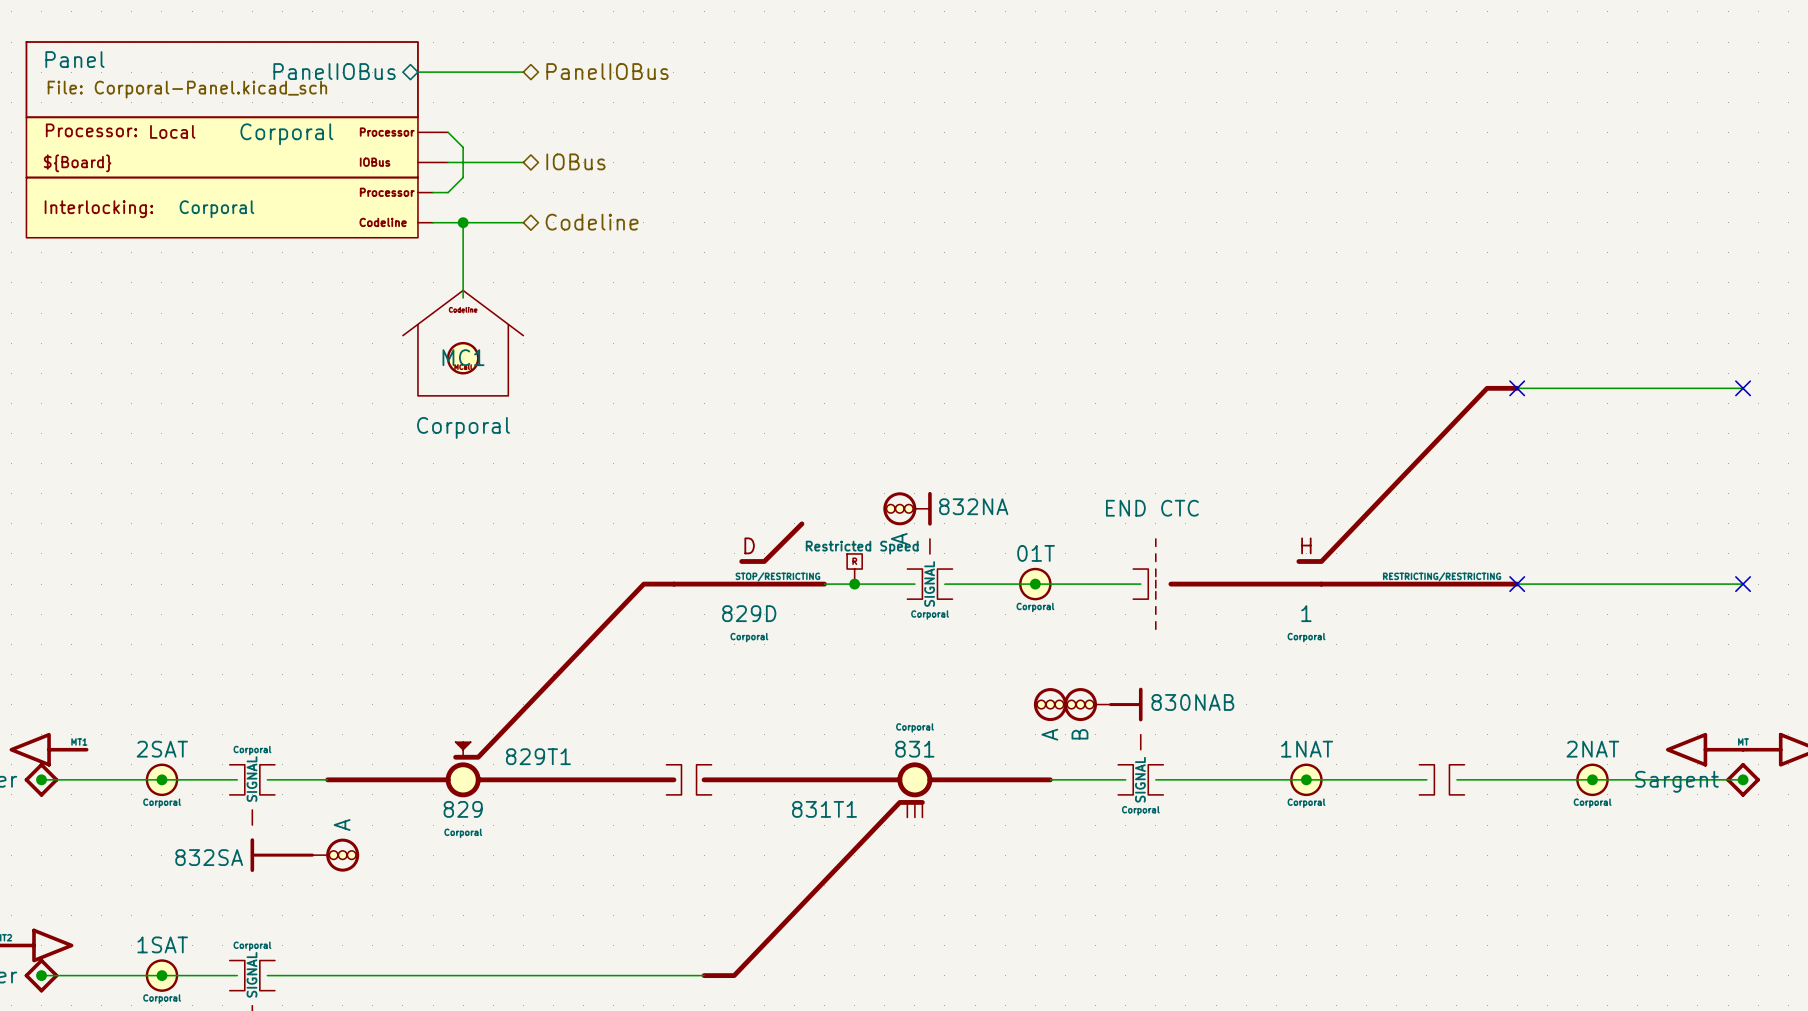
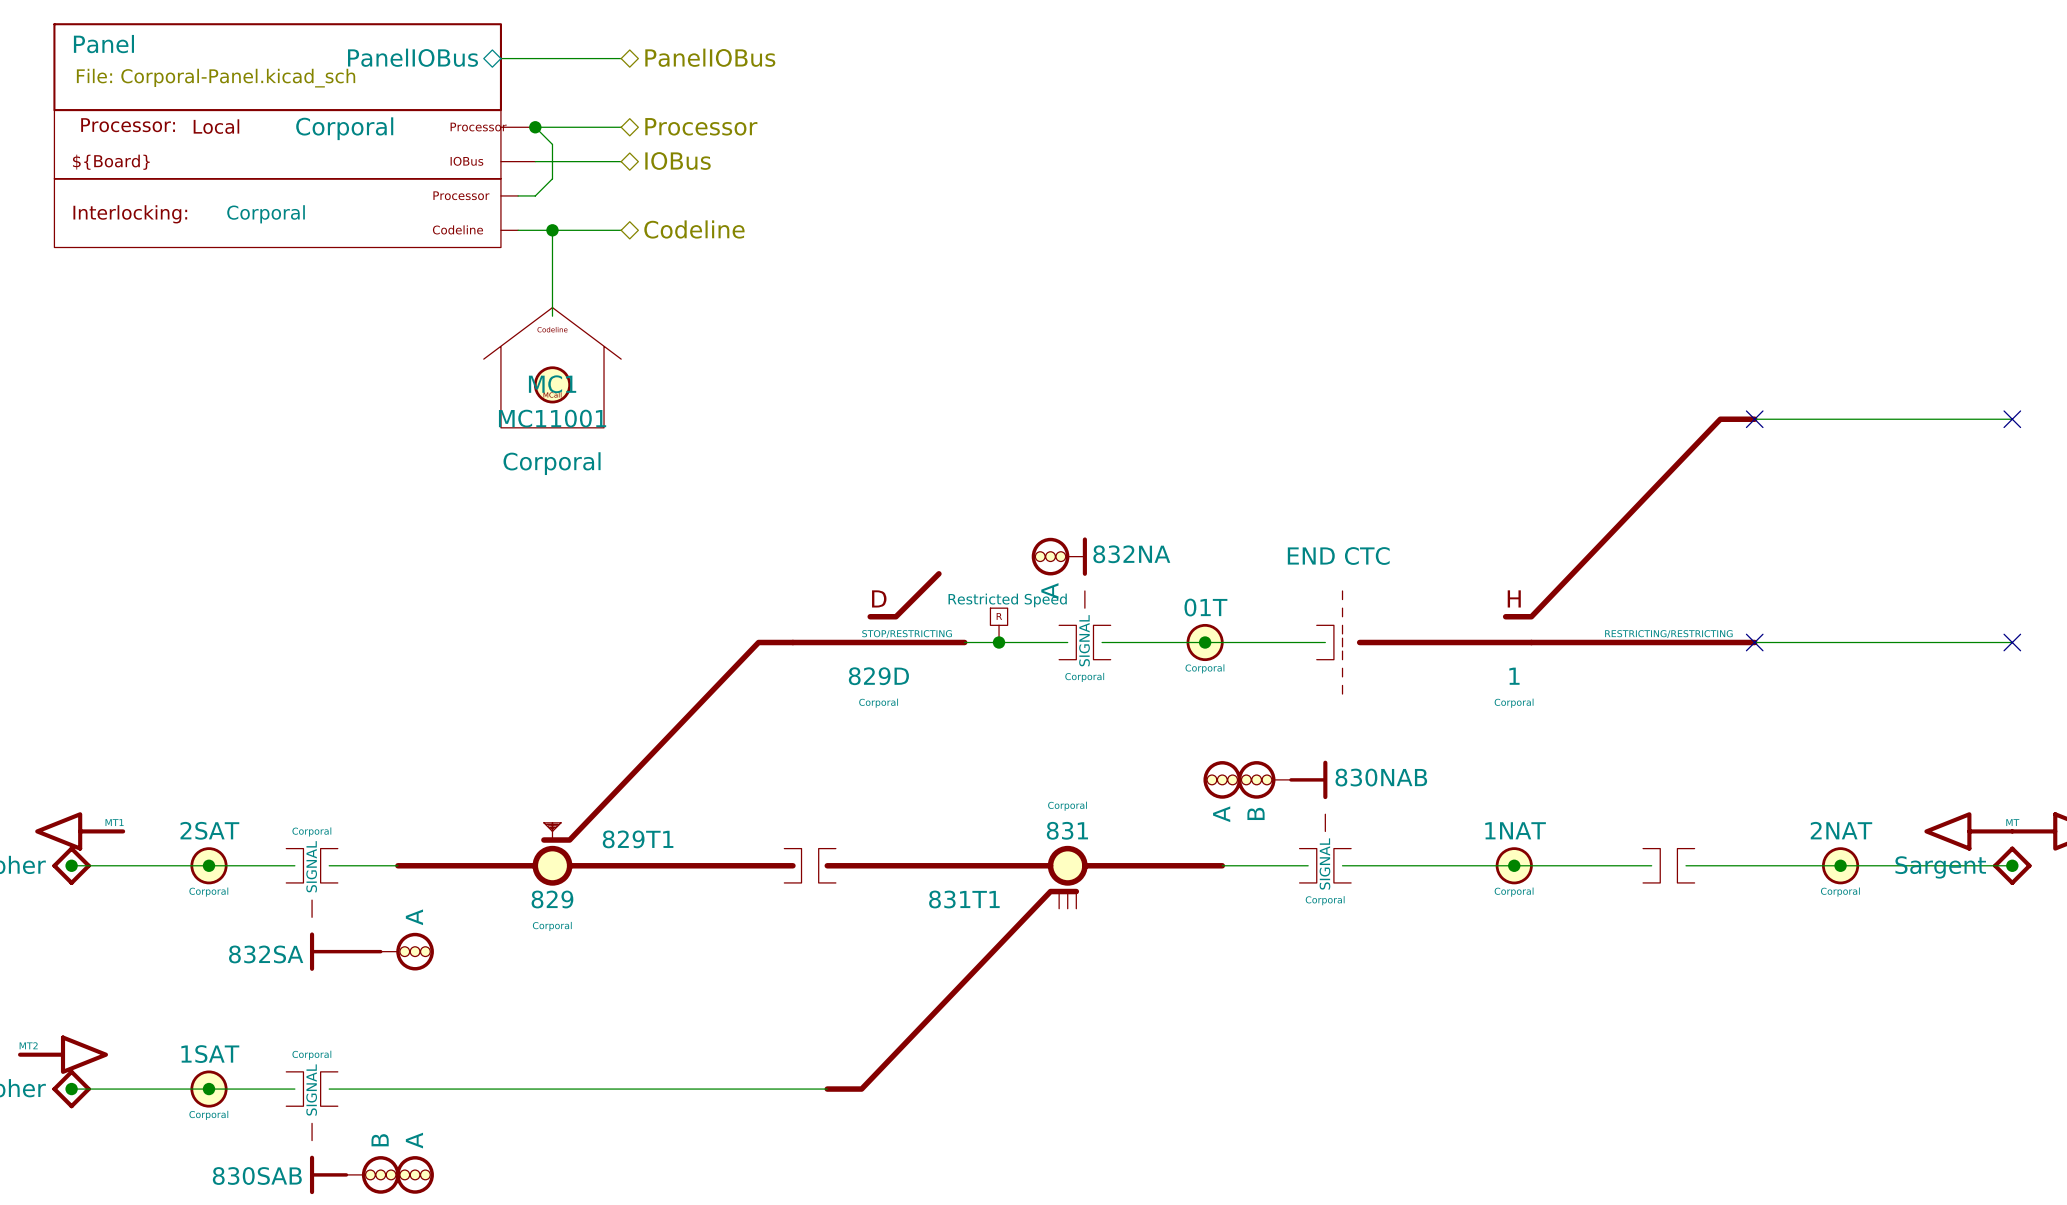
part symbol: [26, 117, 449, 178] -> [54, 110, 536, 179]
hierarchical label: none -> Processor (701, 126)
wire: none -> (535, 127) (621, 127)
junction: none -> (535, 127)
part symbol: [26, 177, 434, 238] -> [54, 178, 519, 248]
MC11001 name: none -> MC11001 (552, 418)

